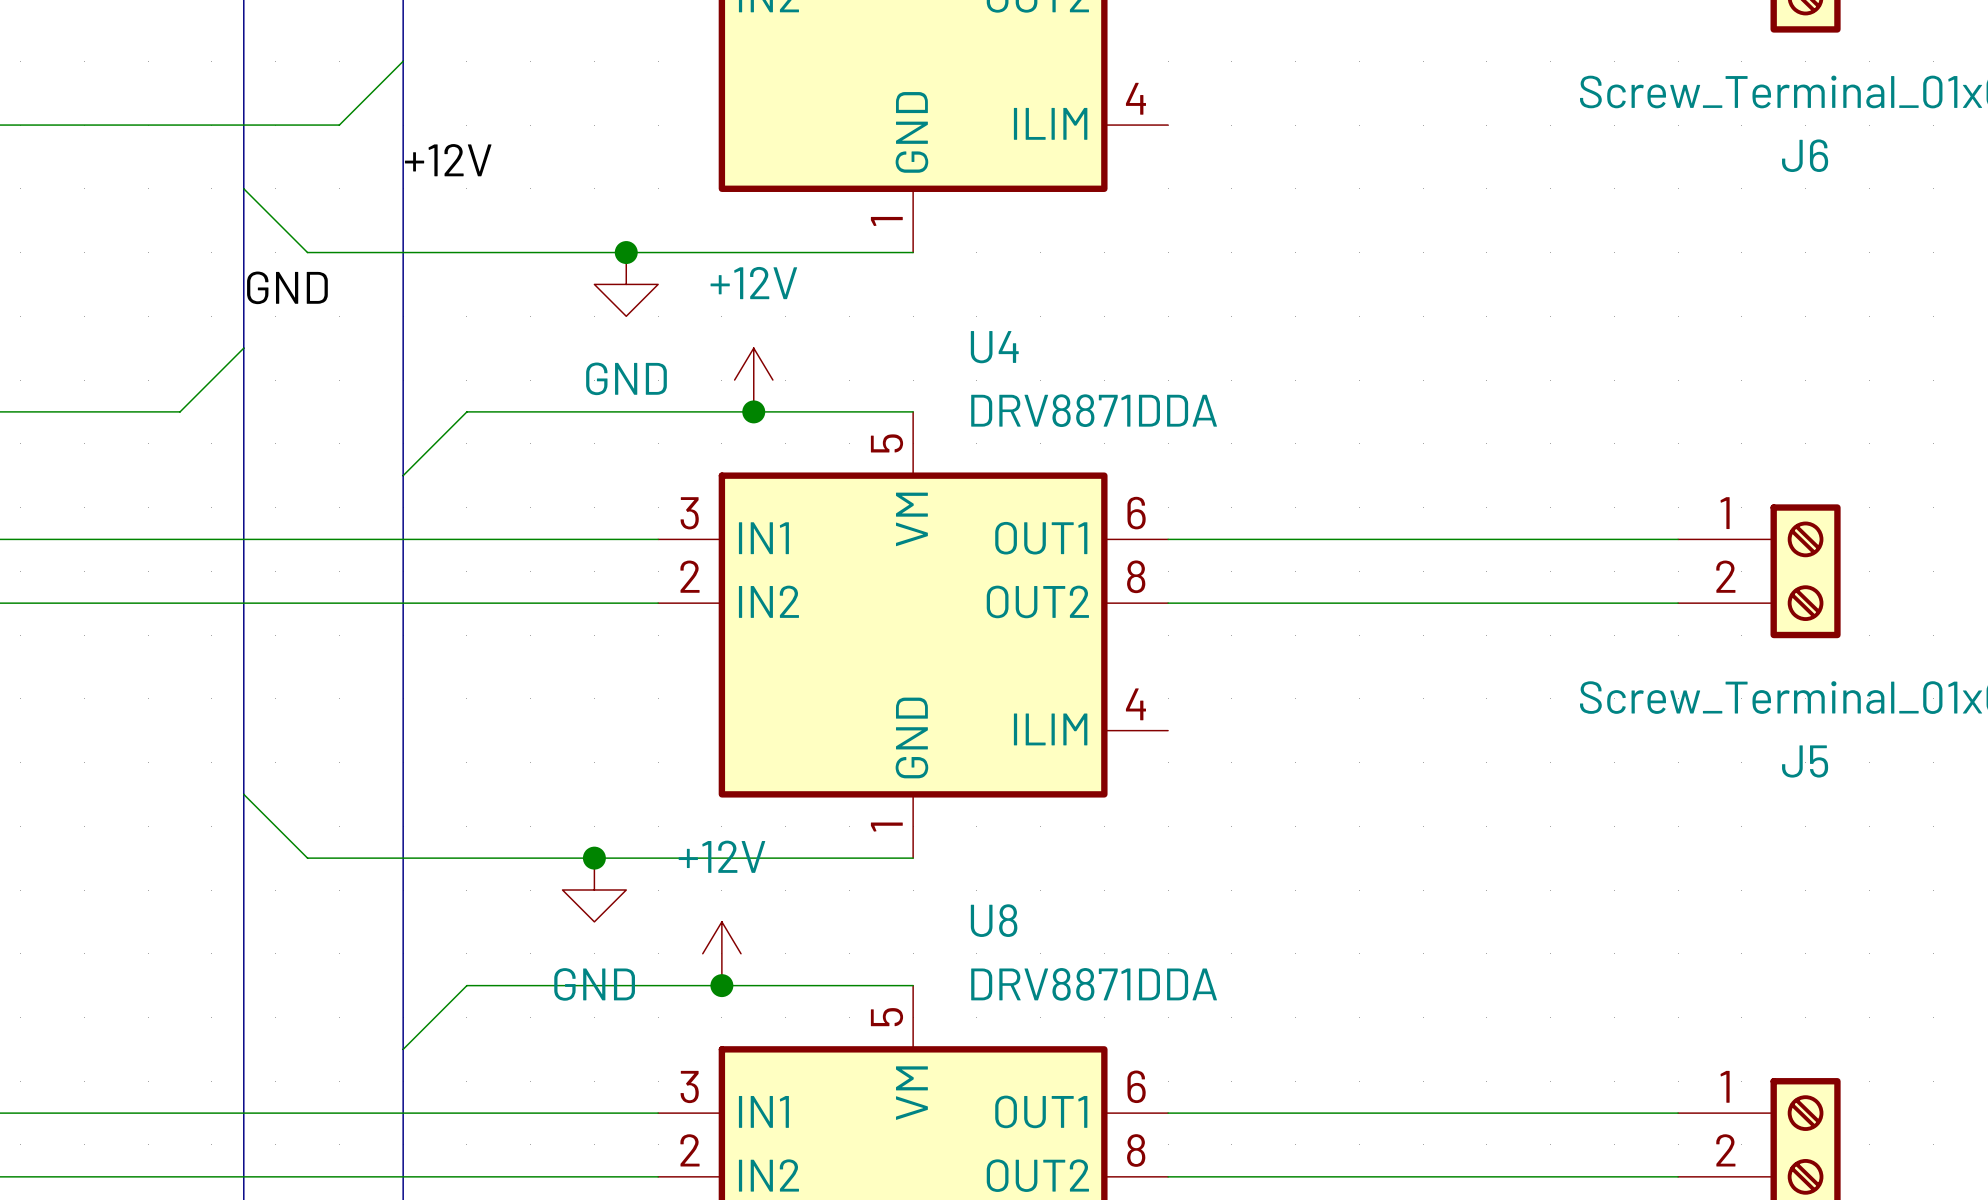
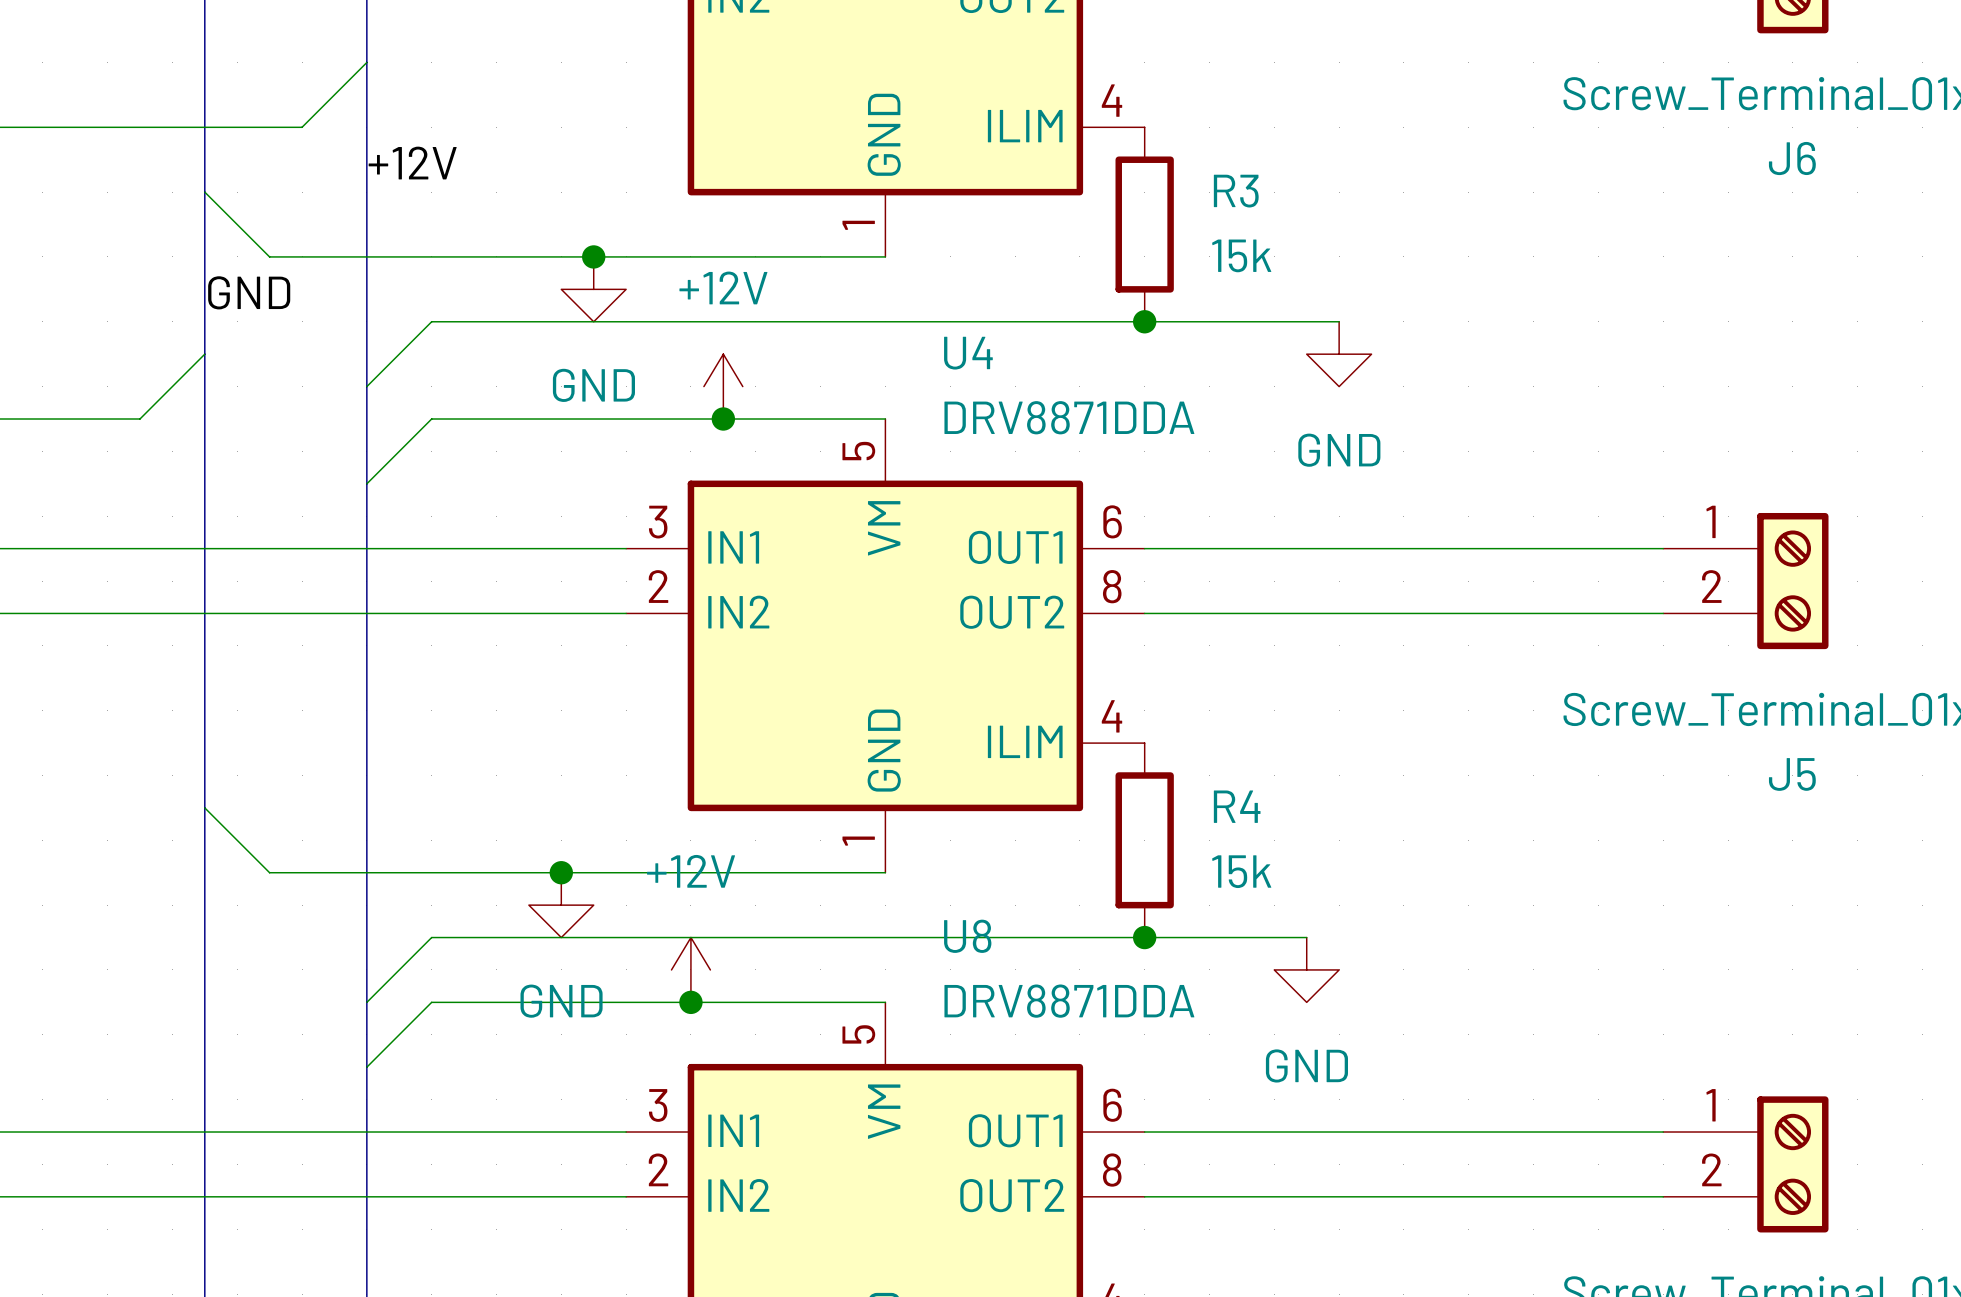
R3: none -> 15k (1144, 224)
junction: none -> (1144, 321)
wire: none -> (1339, 321) (431, 321) (366, 386)
power symbol: none -> GND (1339, 354)
R4: none -> 15k (1144, 840)
junction: none -> (1144, 937)
wire: none -> (1306, 937) (431, 937) (366, 1002)
power symbol: none -> GND (1306, 969)

